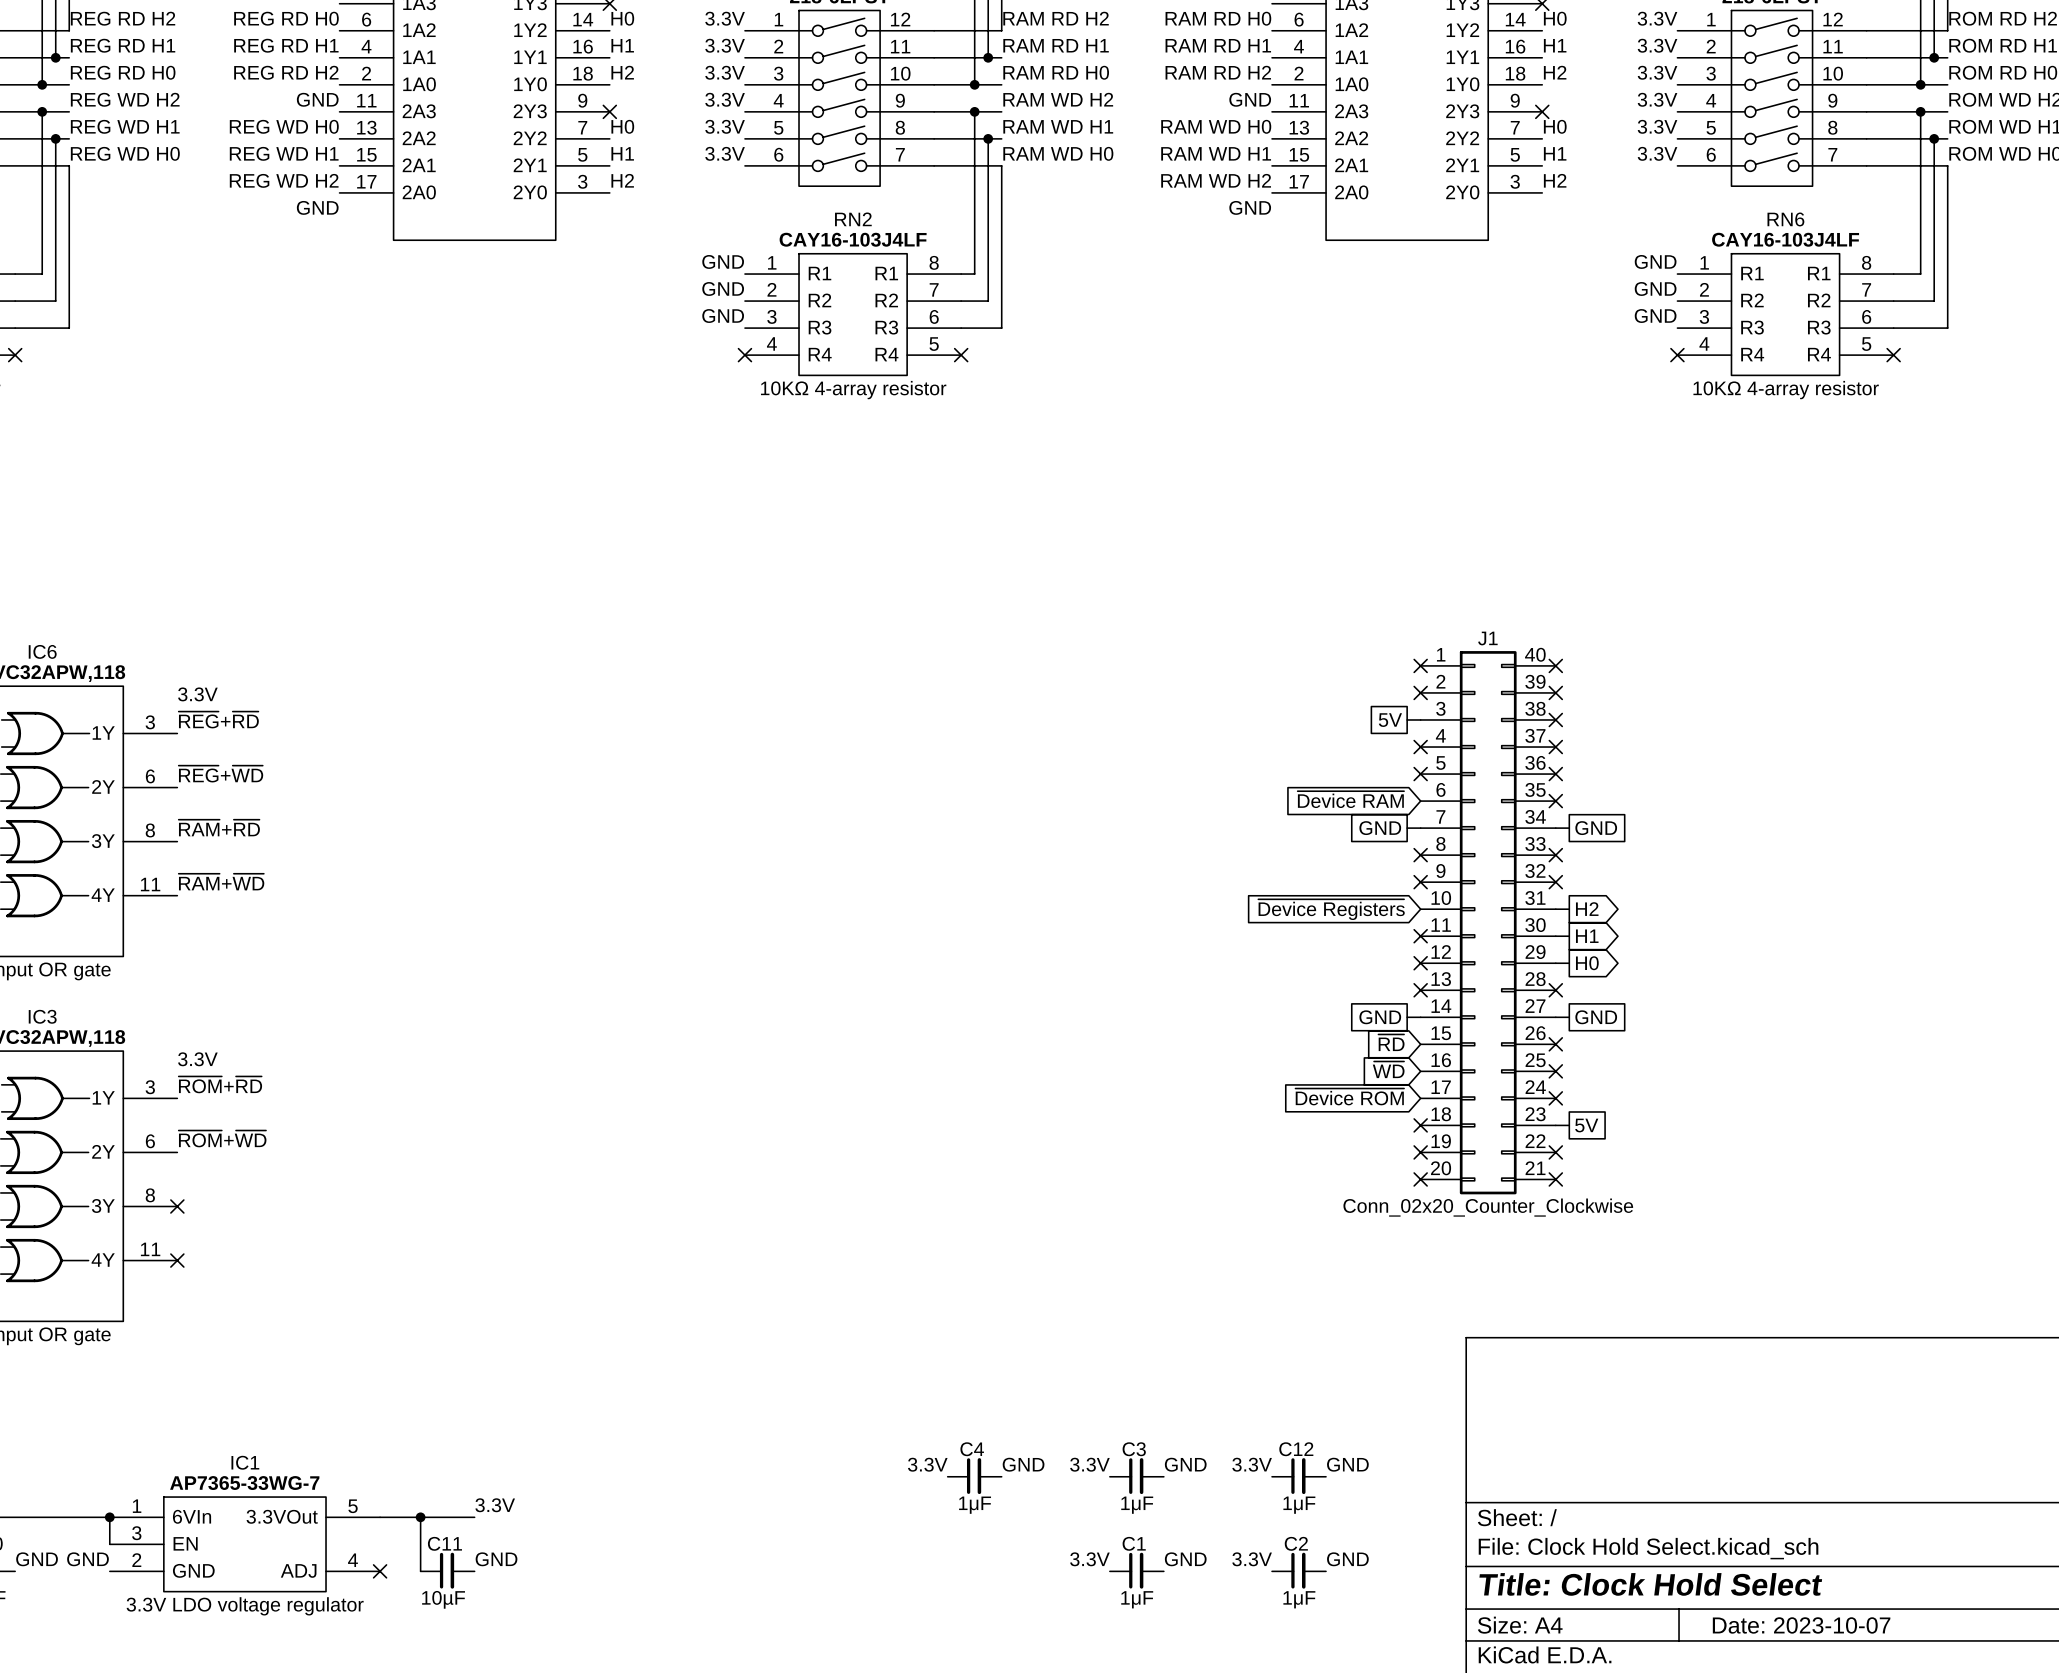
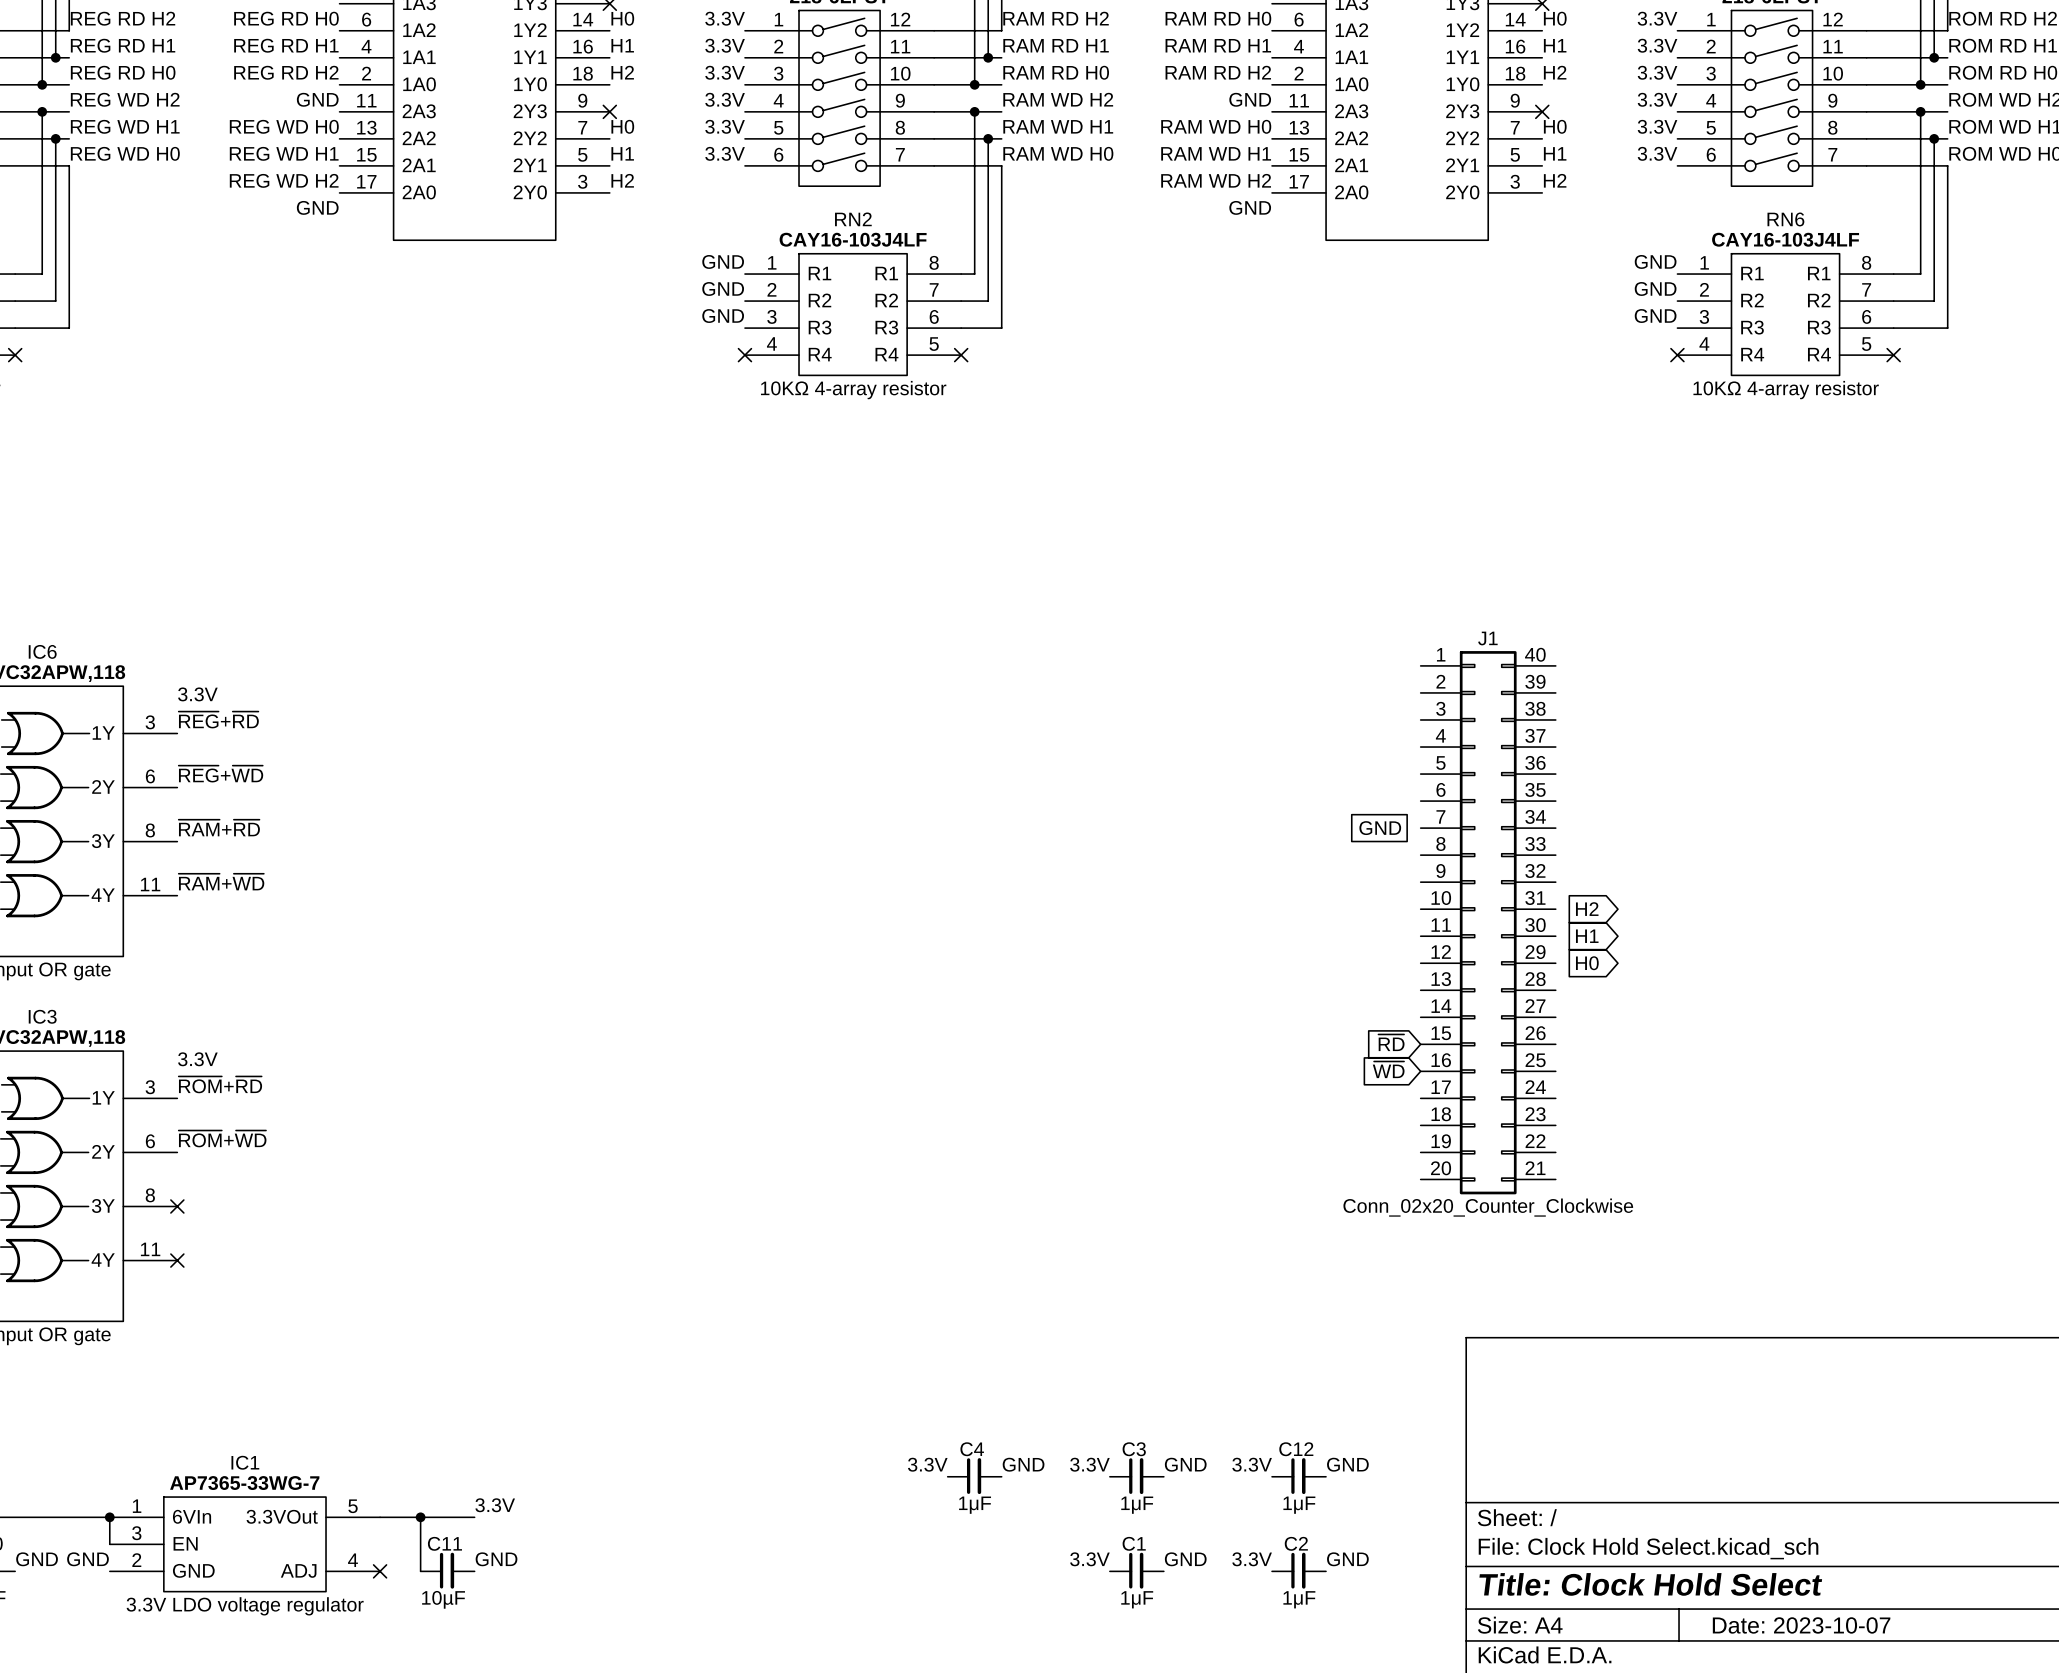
no-connect mark: (1420, 665) -> none
no-connect mark: (1555, 665) -> none
no-connect mark: (1420, 692) -> none
no-connect mark: (1555, 692) -> none
wire: (1407, 719) (1420, 719) -> none
no-connect mark: (1555, 719) -> none
global label: 5V (1390, 720) -> none
no-connect mark: (1420, 747) -> none
no-connect mark: (1555, 747) -> none
no-connect mark: (1420, 774) -> none
no-connect mark: (1555, 774) -> none
global label: ~{Device RAM} (1350, 799) -> none
no-connect mark: (1555, 801) -> none
wire: (1407, 828) (1420, 828) -> none
wire: (1555, 828) (1569, 828) -> none
global label: GND (1596, 828) -> none
no-connect mark: (1420, 855) -> none
no-connect mark: (1555, 855) -> none
no-connect mark: (1420, 882) -> none
no-connect mark: (1555, 882) -> none
global label: ~{Device Registers} (1331, 909) -> none
wire: (1555, 909) (1569, 909) -> none
no-connect mark: (1420, 936) -> none
wire: (1555, 936) (1569, 936) -> none
no-connect mark: (1420, 963) -> none
wire: (1555, 963) (1569, 963) -> none
no-connect mark: (1420, 990) -> none
no-connect mark: (1555, 990) -> none
global label: GND (1380, 1017) -> none
wire: (1407, 1017) (1420, 1017) -> none
wire: (1555, 1017) (1569, 1017) -> none
global label: GND (1596, 1017) -> none
no-connect mark: (1555, 1044) -> none
no-connect mark: (1555, 1071) -> none
global label: ~{Device ROM} (1349, 1096) -> none
no-connect mark: (1555, 1098) -> none
no-connect mark: (1420, 1125) -> none
wire: (1555, 1125) (1569, 1125) -> none
global label: 5V (1586, 1125) -> none
no-connect mark: (1420, 1152) -> none
no-connect mark: (1555, 1152) -> none
no-connect mark: (1420, 1179) -> none
no-connect mark: (1555, 1179) -> none

